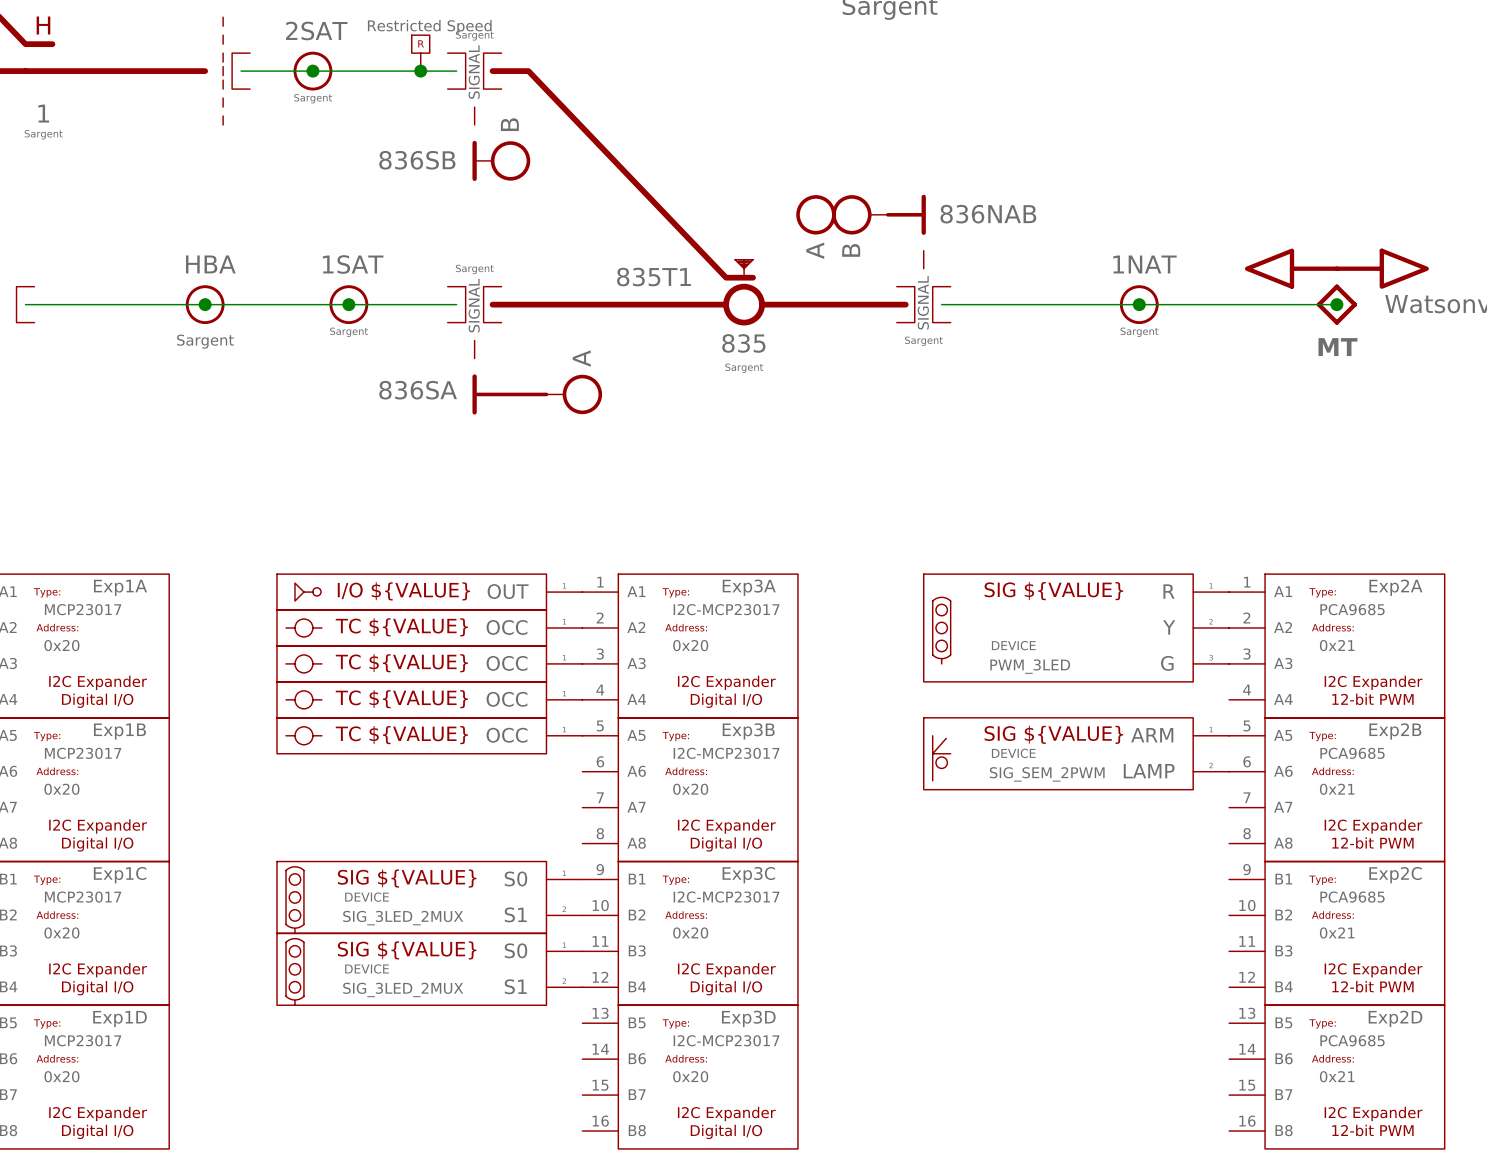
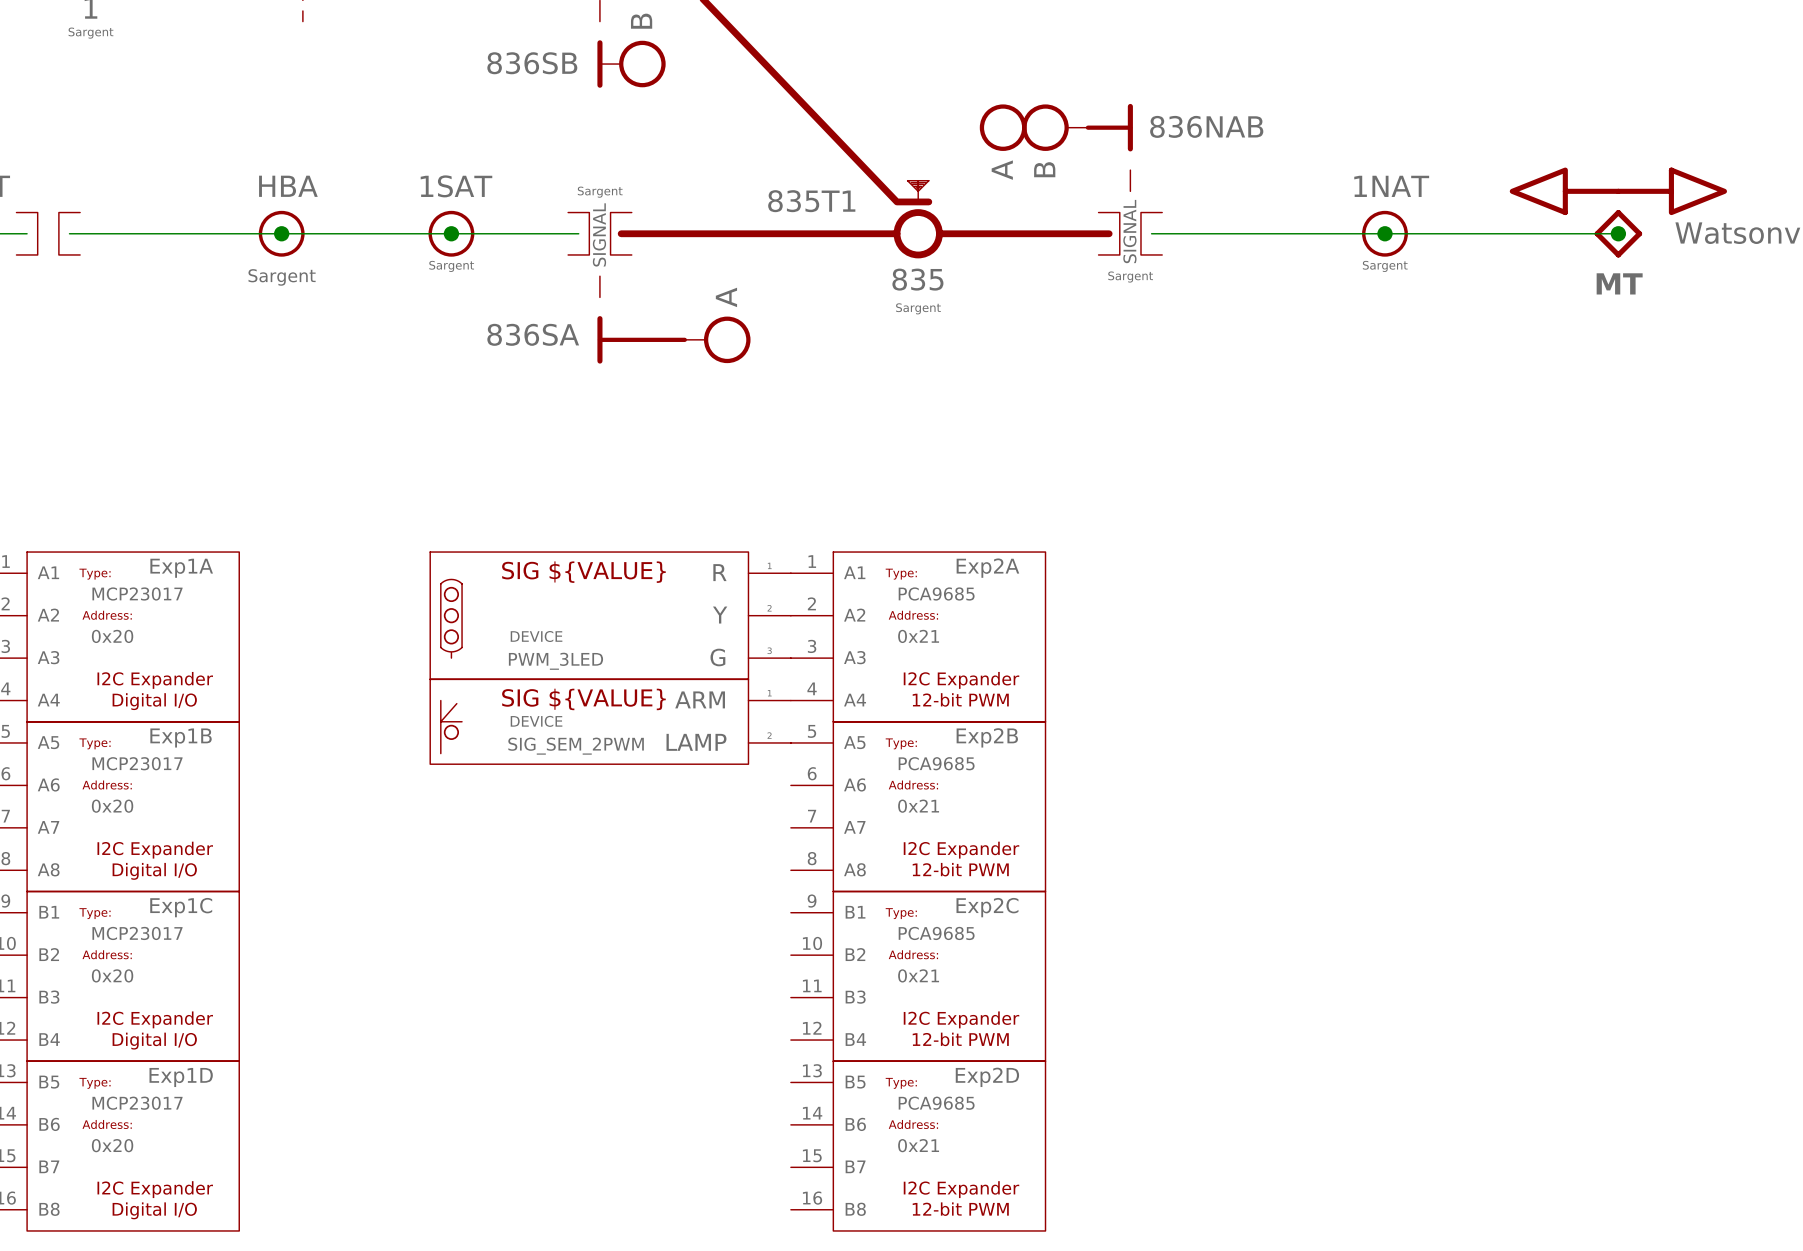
part: (429, 592) -> none
part: (429, 627) -> none
part: none -> (610, 615)
part: (1076, 627) -> none
Exp3A: 0x20 (690, 645) -> none
Exp2A position: (1336, 645) -> (918, 636)
part: (429, 663) -> none
part: (429, 699) -> none
part: none -> (610, 721)
part: (429, 735) -> none
part: (1076, 753) -> none
Exp3B: 0x20 (690, 789) -> none
Exp2B position: (1336, 789) -> (918, 806)
part: (429, 897) -> none
Exp3C: 0x20 (690, 933) -> none
Exp2C position: (1336, 933) -> (918, 976)
part: (429, 969) -> none
Exp3D: 0x20 (690, 1077) -> none
Exp2D position: (1336, 1077) -> (918, 1146)

